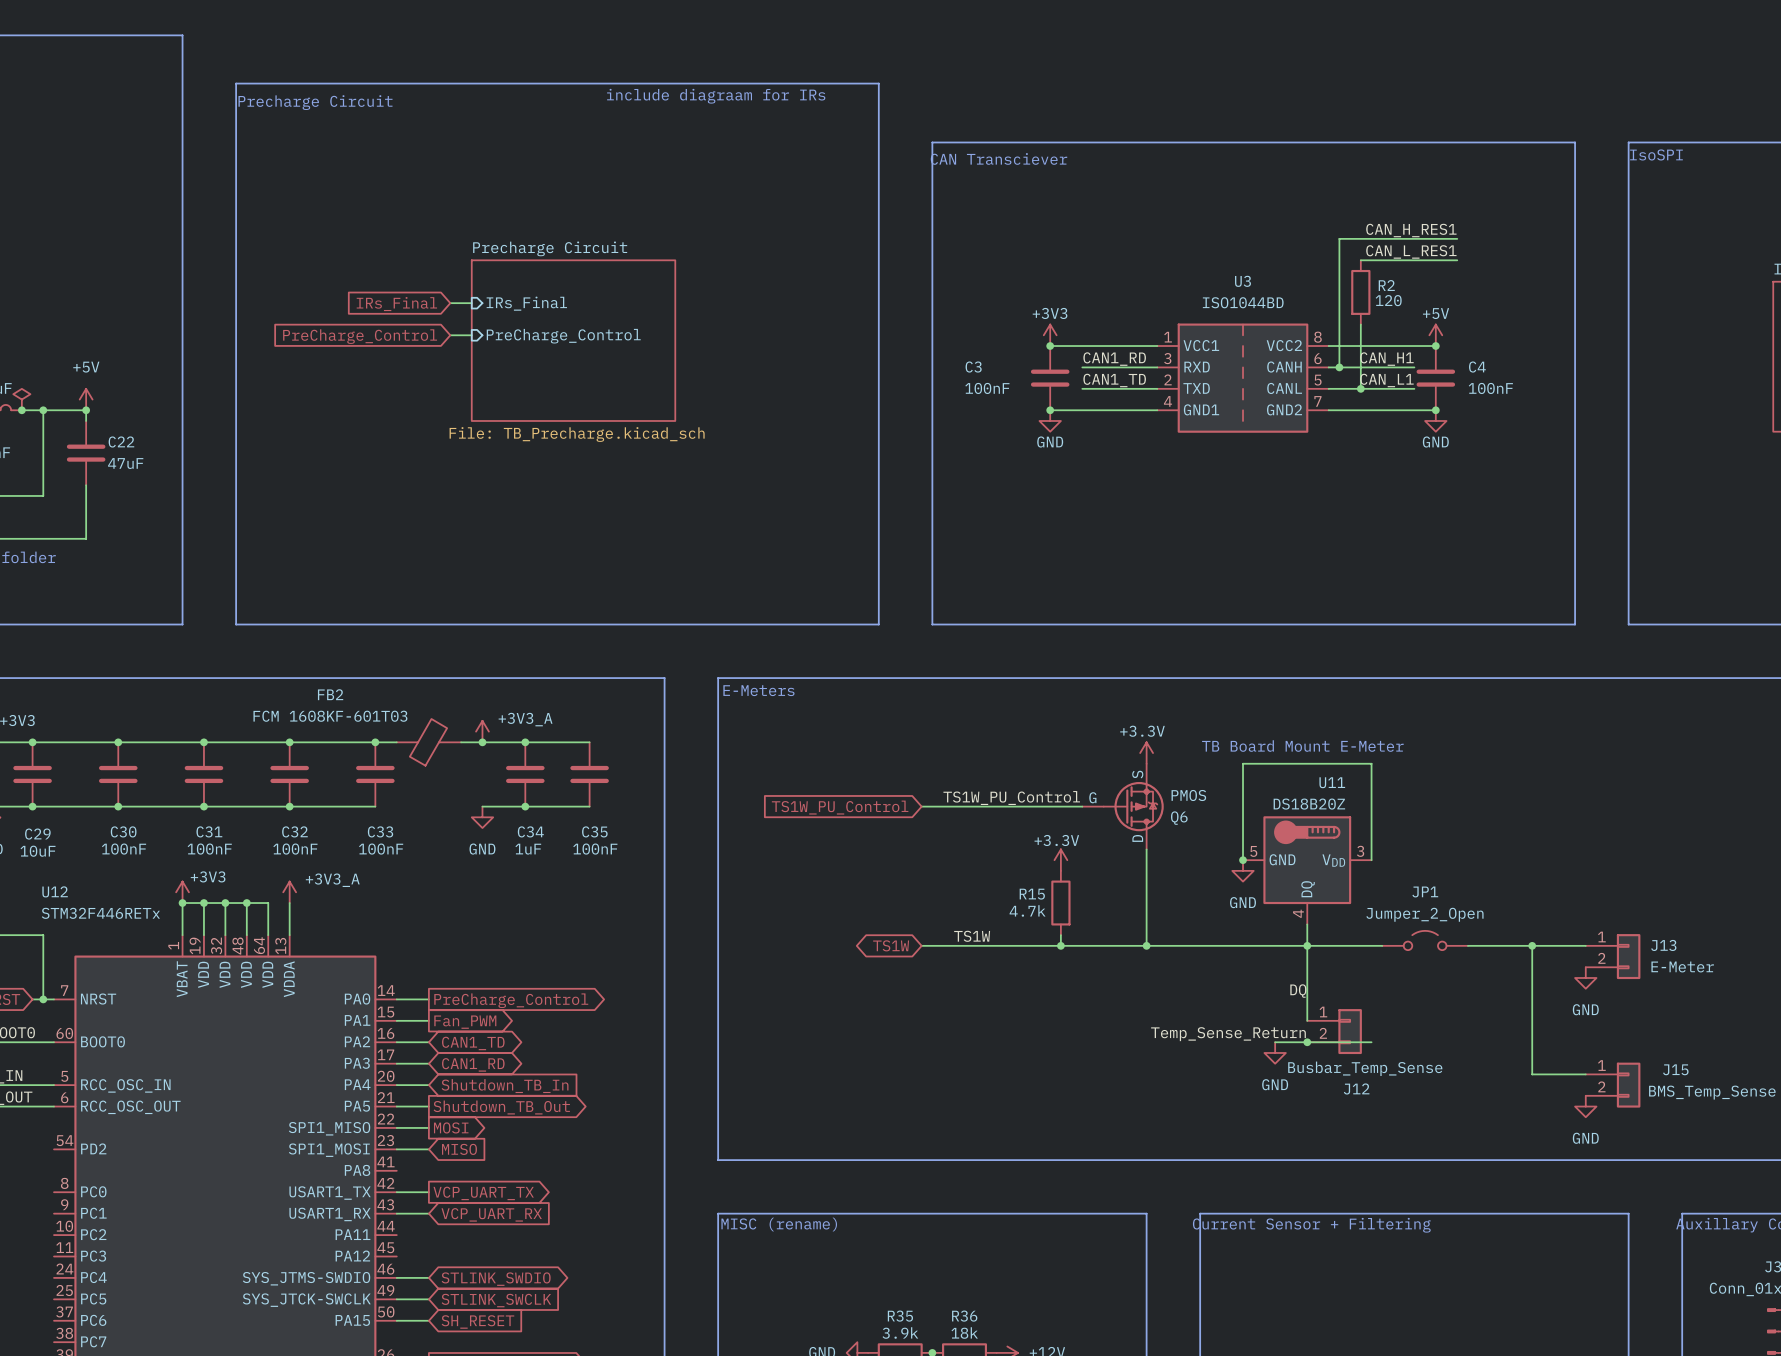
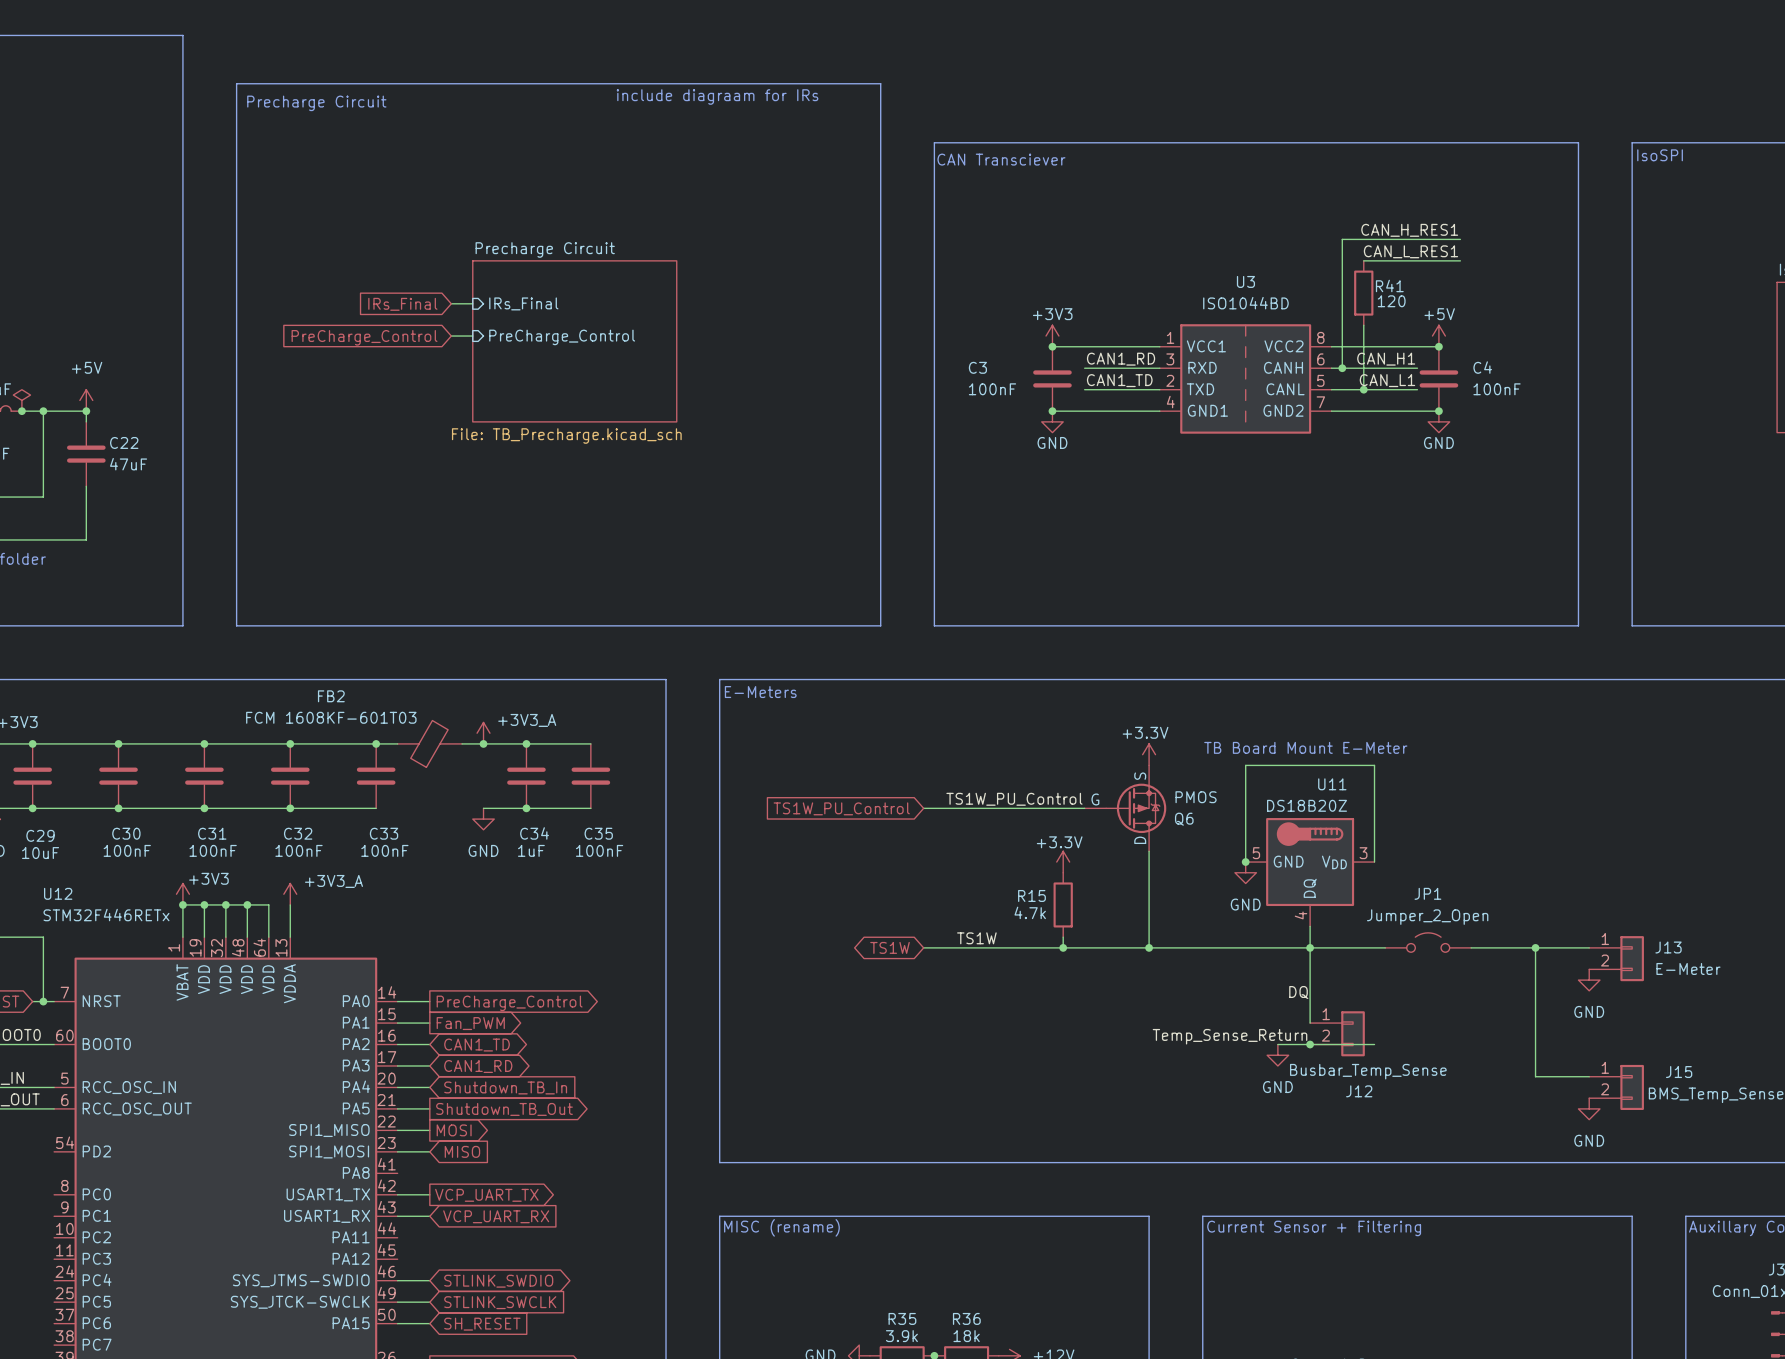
R2 name: R2 (1386, 285) -> R41 (1389, 285)

